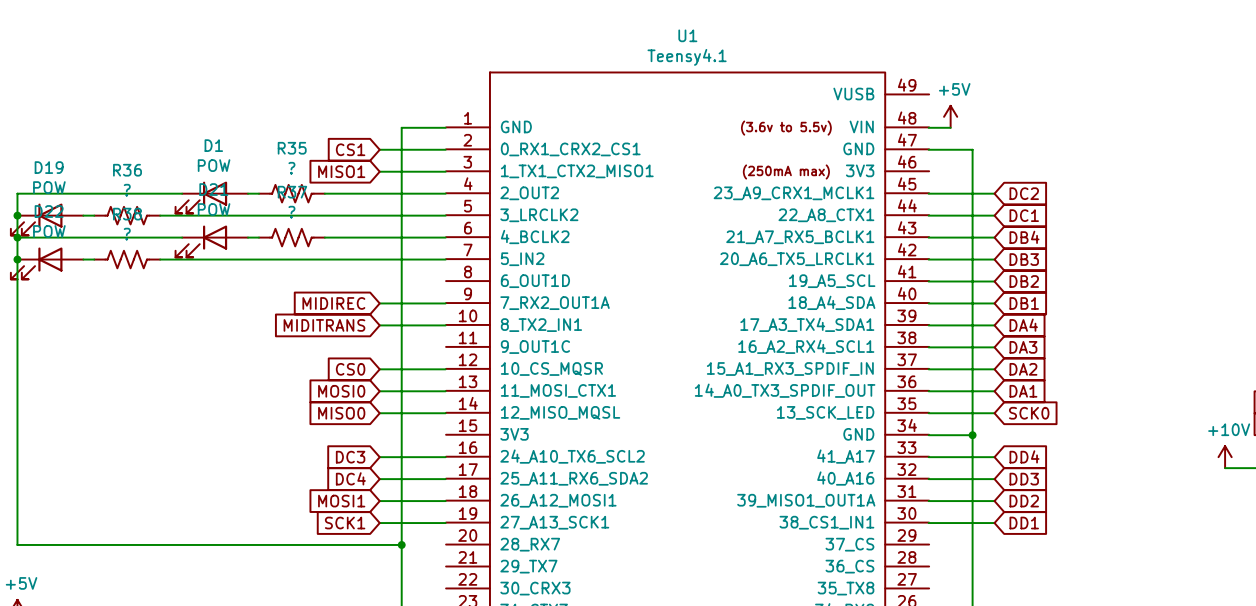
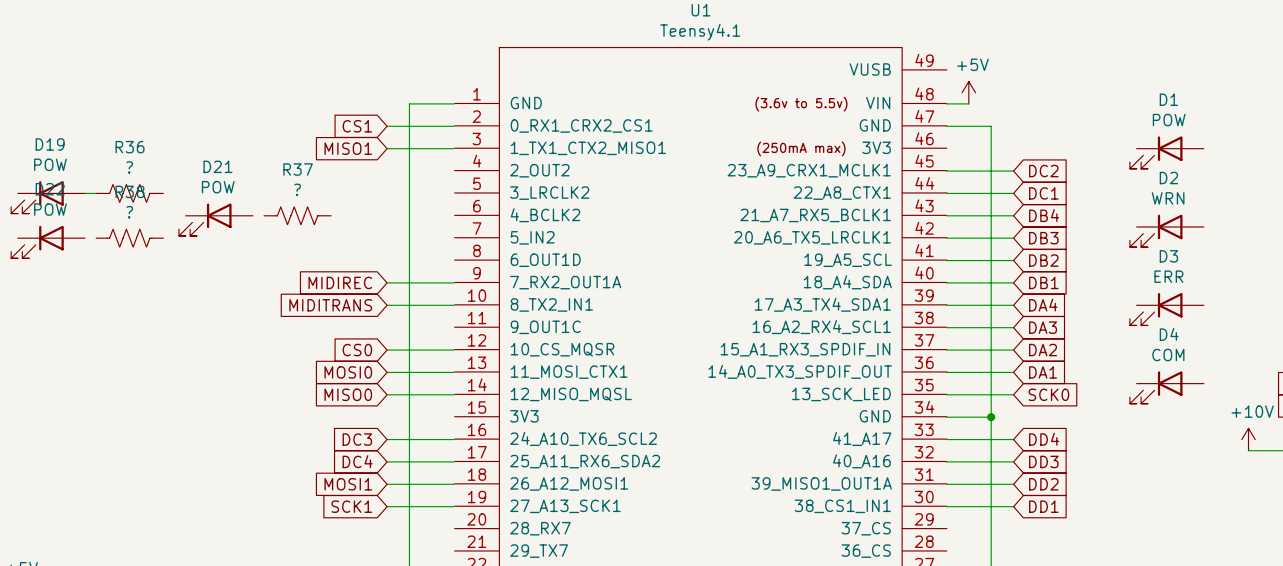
wire: (182, 193) (17, 193) (17, 544) (401, 544) -> none
wire: (248, 193) (258, 193) -> none
R35: ? (291, 193) -> none
wire: (324, 193) (445, 193) -> none
D1 position: (211, 197) -> (1166, 152)
junction: (17, 215) -> none
wire: (160, 215) (445, 215) -> none
wire: (17, 237) (182, 237) -> none
junction: (17, 237) -> none
wire: (248, 237) (258, 237) -> none
wire: (324, 237) (445, 237) -> none
D2: none -> WRN (1166, 230)
junction: (17, 259) -> none
wire: (83, 259) (94, 259) -> none
wire: (160, 259) (445, 259) -> none
D3: none -> ERR (1166, 309)
D4: none -> COM (1166, 387)
junction: (401, 544) -> none

